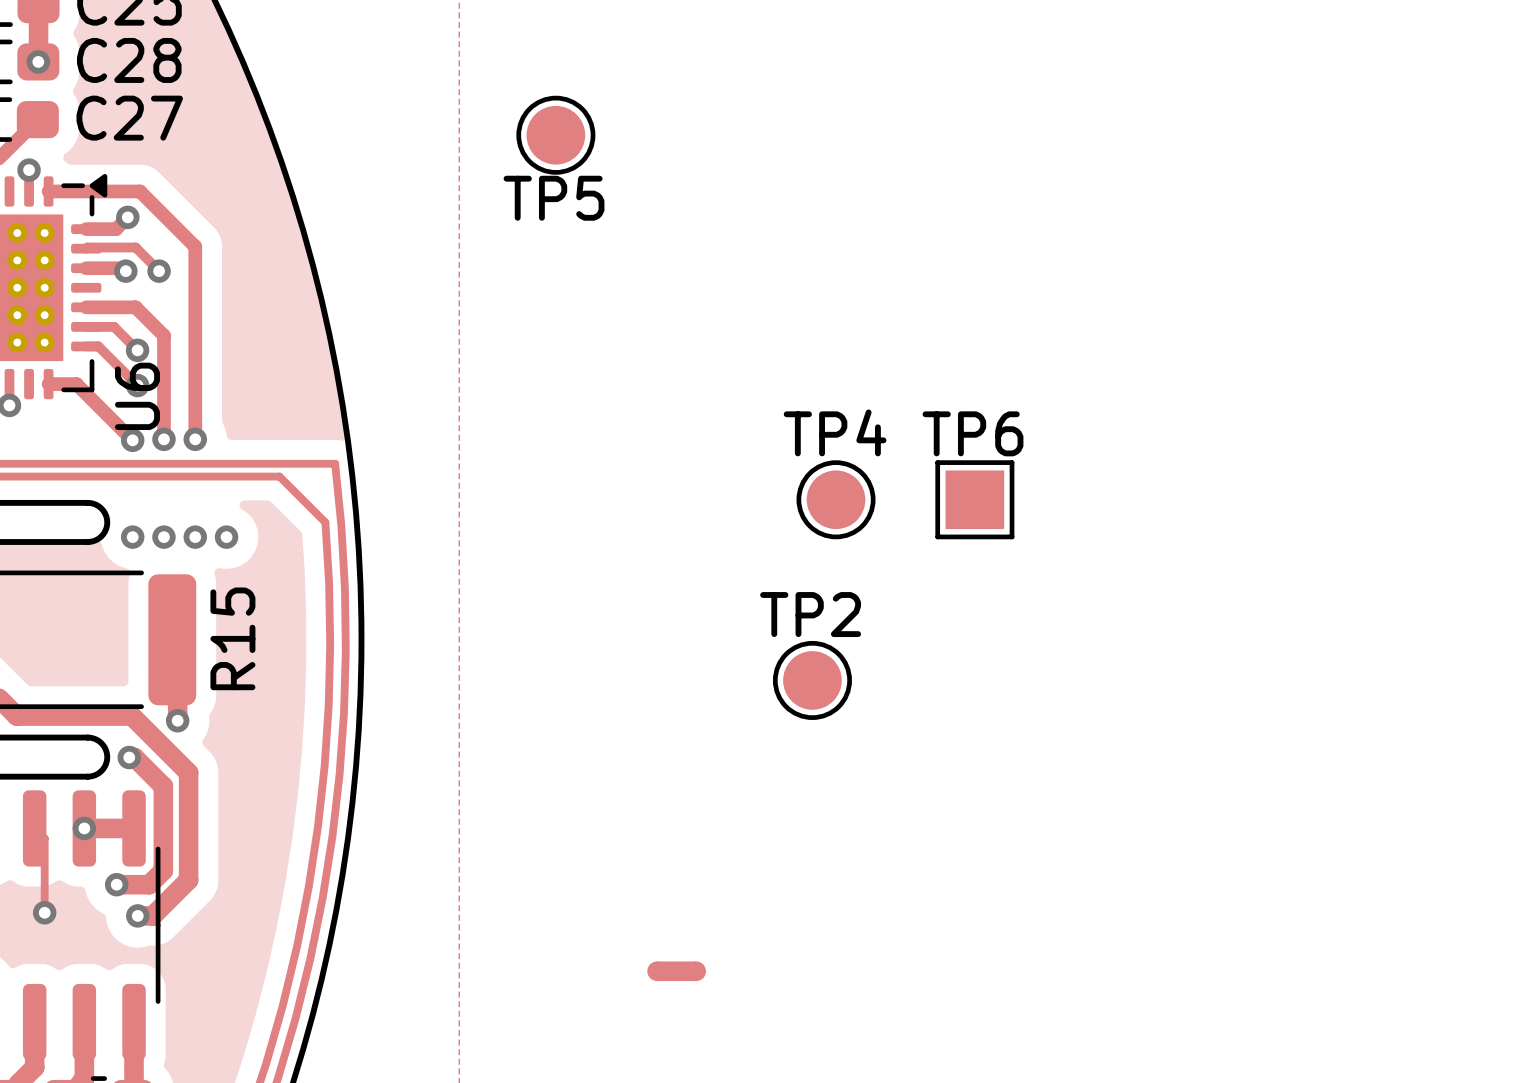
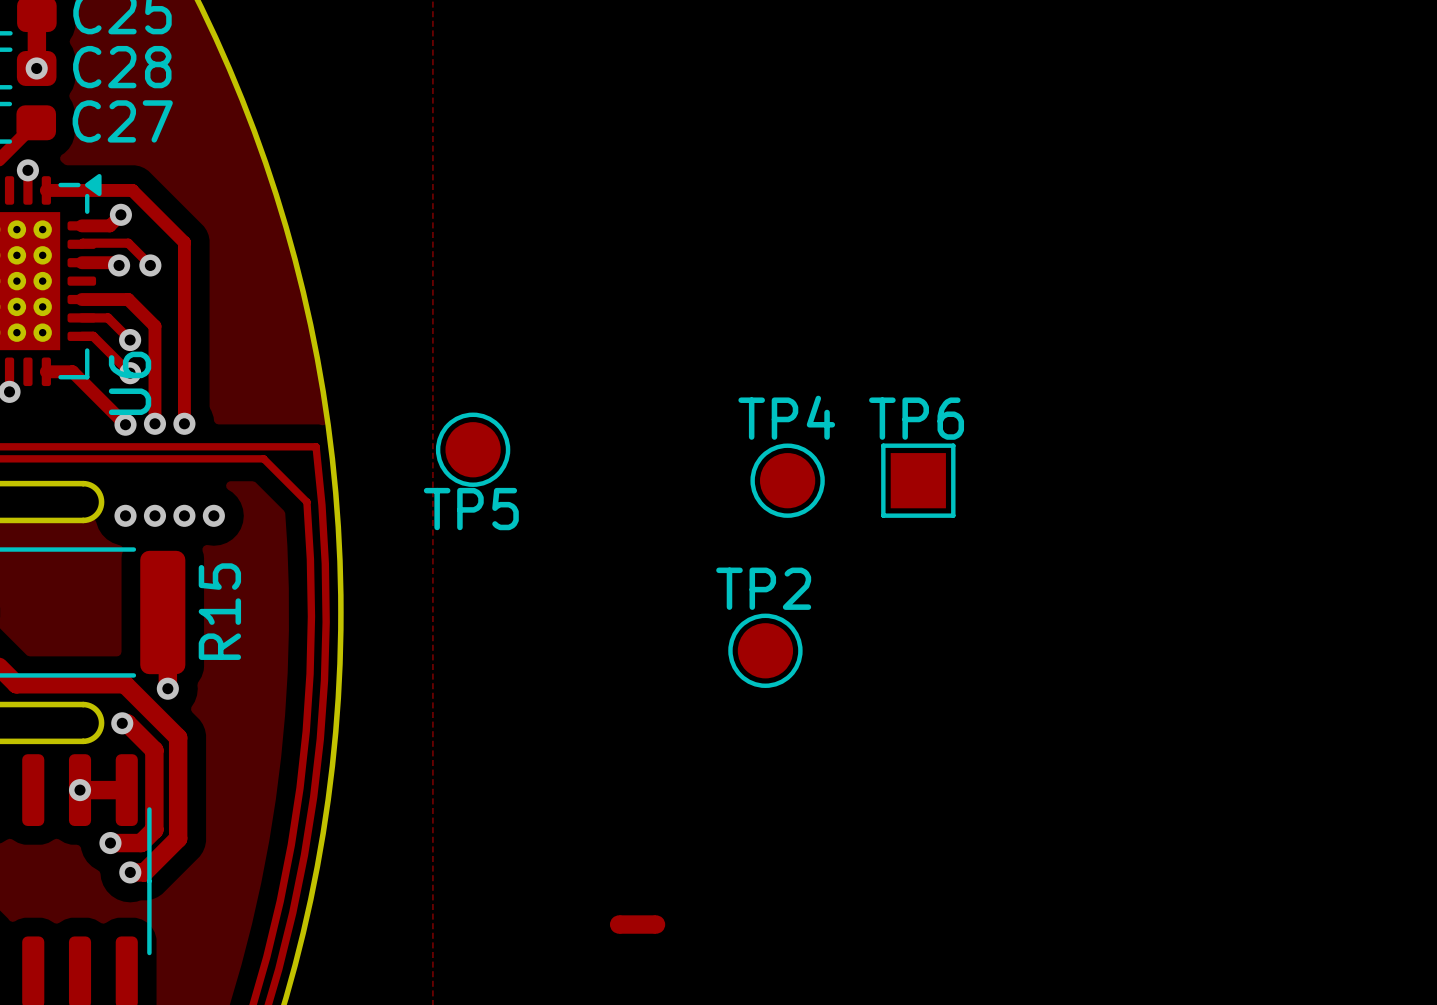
TP5 position: (555, 135) -> (473, 449)
track: (34, 828) (44, 838) (44, 912) -> none
via: (44, 912) -> none

